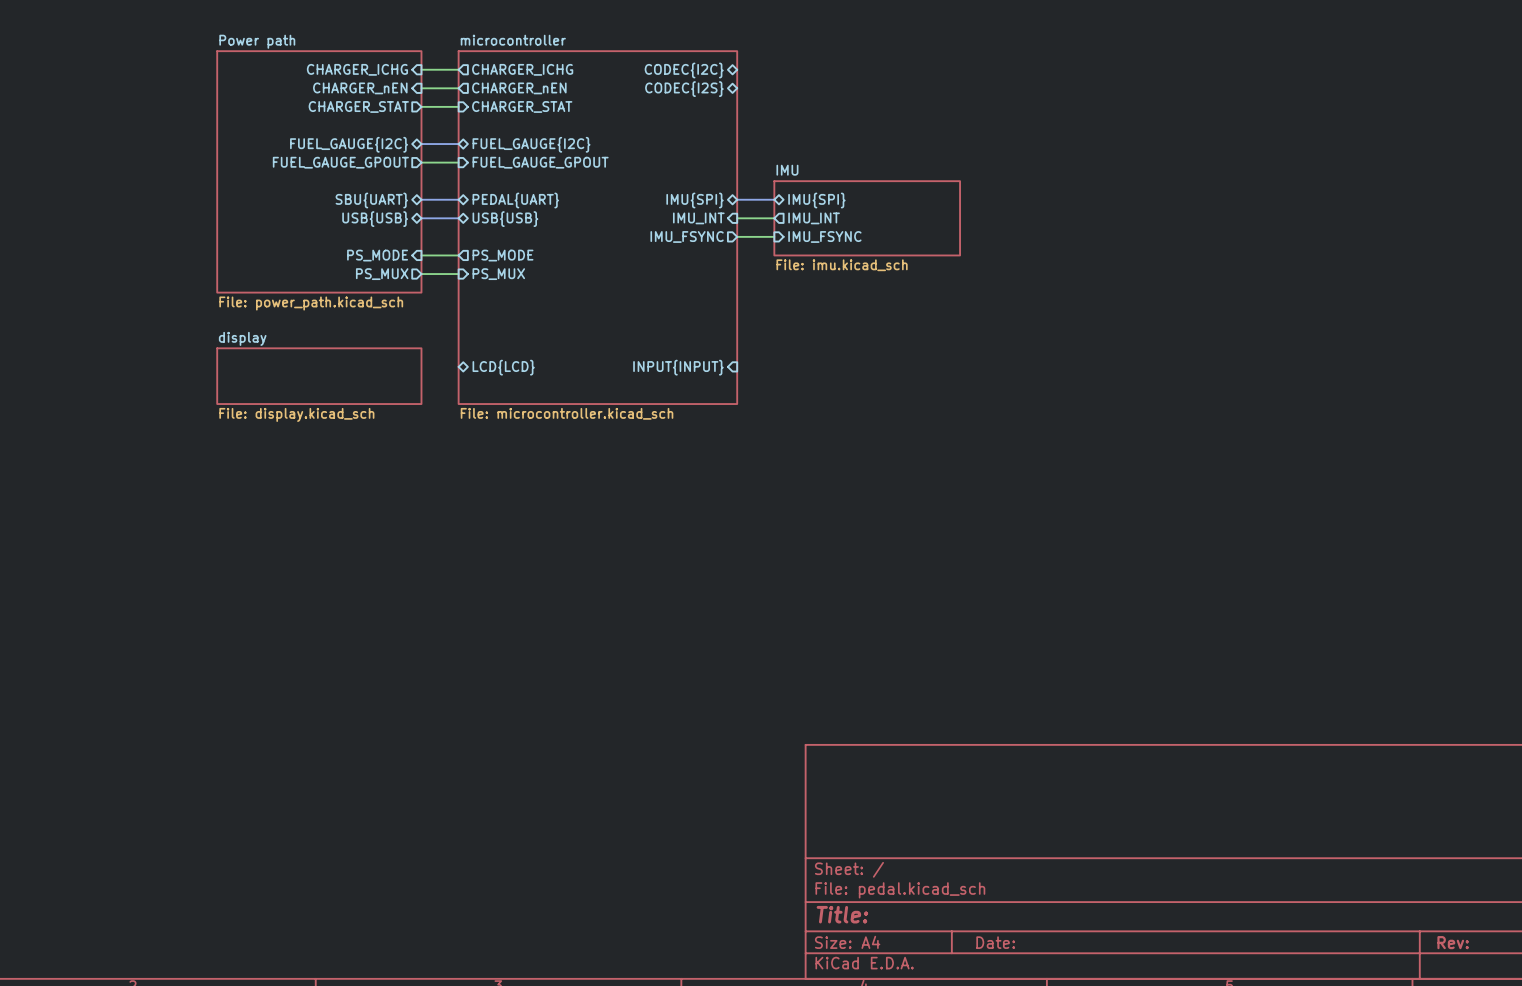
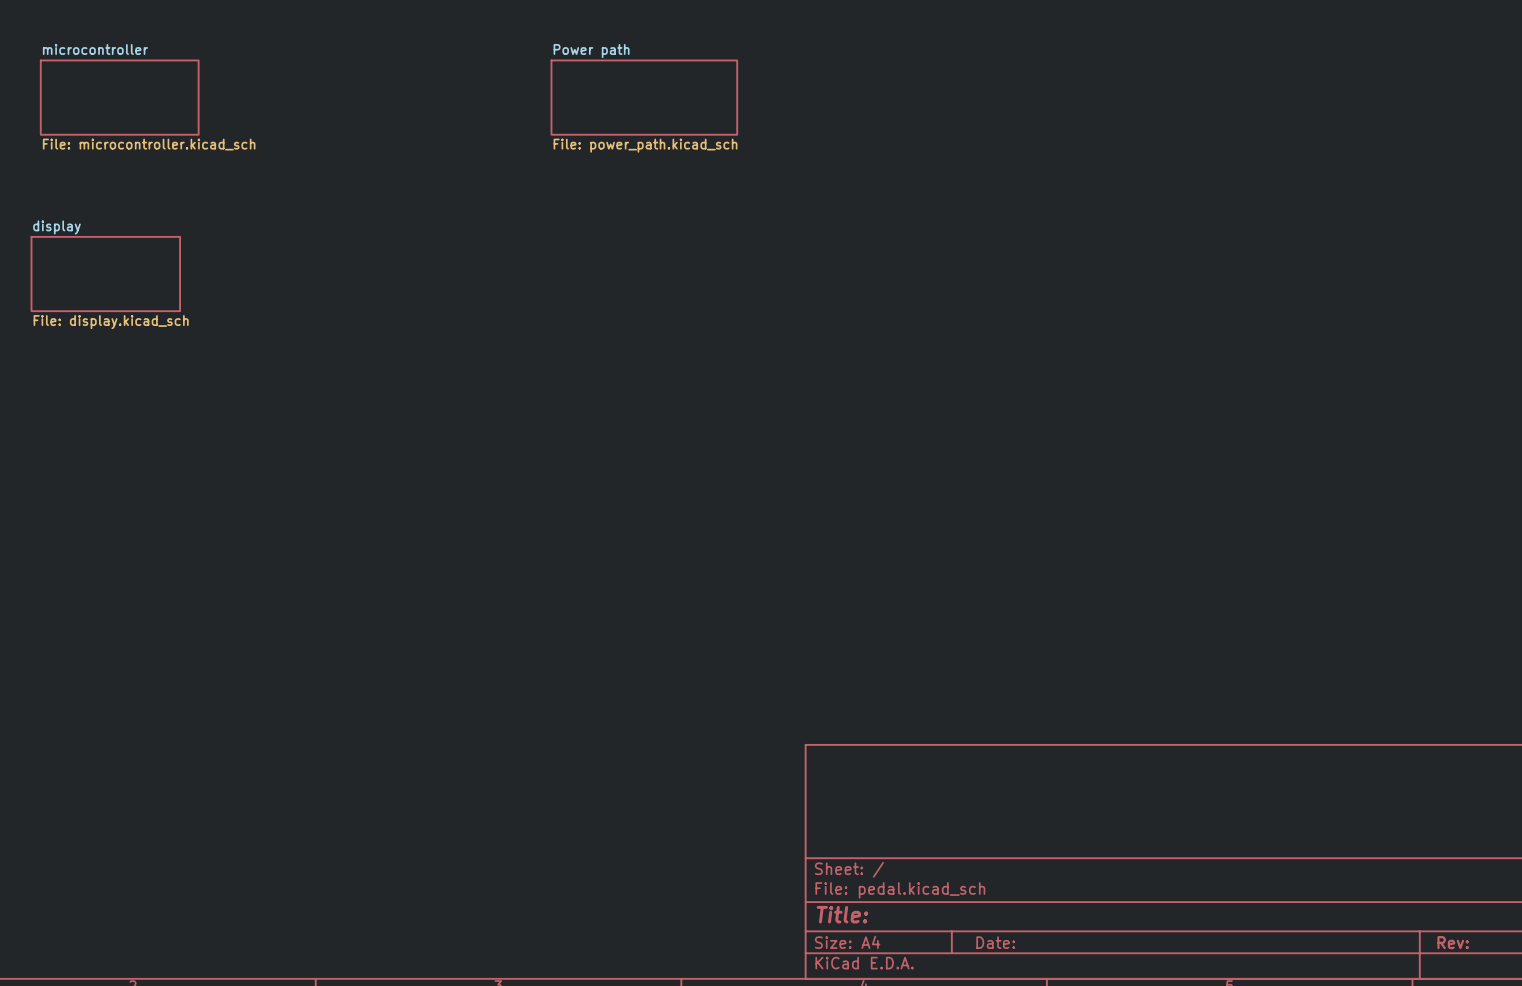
sheet pin: CHARGER_ICHG (357, 69) -> none
wire: (421, 69) (458, 69) -> none
sheet pin: CHARGER_ICHG (522, 69) -> none
sheet pin: CODEC{I2C} (684, 70) -> none
sheet pin: CHARGER_nEN (360, 88) -> none
wire: (421, 88) (458, 88) -> none
sheet pin: CHARGER_nEN (519, 88) -> none
sheet pin: CODEC{I2S} (684, 89) -> none
sheet microcontroller: none -> File: microcontroller.kicad_sch (119, 97)
sheet Power path: none -> File: power_path.kicad_sch (644, 97)
sheet pin: CHARGER_STAT (358, 106) -> none
wire: (421, 106) (458, 106) -> none
sheet pin: CHARGER_STAT (522, 106) -> none
sheet pin: FUEL_GAUGE{I2C} (349, 144) -> none
bus: (421, 144) (458, 144) -> none
sheet pin: FUEL_GAUGE{I2C} (531, 144) -> none
sheet pin: FUEL_GAUGE_GPOUT (340, 162) -> none
wire: (421, 162) (458, 162) -> none
sheet pin: FUEL_GAUGE_GPOUT (540, 162) -> none
sheet Power path: File: power_path.kicad_sch (319, 171) -> none
bus: (421, 199) (458, 199) -> none
bus: (737, 199) (774, 199) -> none
sheet pin: SBU{UART} (371, 200) -> none
sheet pin: PEDAL{UART} (515, 200) -> none
sheet pin: IMU{SPI} (695, 200) -> none
sheet pin: IMU{SPI} (816, 200) -> none
bus: (421, 218) (458, 218) -> none
sheet pin: IMU_INT (698, 218) -> none
wire: (737, 218) (774, 218) -> none
sheet pin: IMU_INT (814, 218) -> none
sheet IMU: File: imu.kicad_sch (867, 218) -> none
sheet pin: USB{USB} (375, 219) -> none
sheet pin: USB{USB} (505, 219) -> none
sheet microcontroller: File: microcontroller.kicad_sch (597, 227) -> none
sheet pin: IMU_FSYNC (687, 236) -> none
wire: (737, 236) (774, 236) -> none
sheet pin: IMU_FSYNC (824, 236) -> none
sheet pin: PS_MODE (377, 255) -> none
wire: (421, 255) (458, 255) -> none
sheet pin: PS_MODE (502, 255) -> none
sheet display: none -> File: display.kicad_sch (105, 274)
sheet pin: PS_MUX (382, 274) -> none
wire: (421, 274) (458, 274) -> none
sheet pin: PS_MUX (498, 274) -> none
sheet pin: LCD{LCD} (503, 367) -> none
sheet pin: INPUT{INPUT} (678, 367) -> none
sheet display: File: display.kicad_sch (319, 376) -> none

